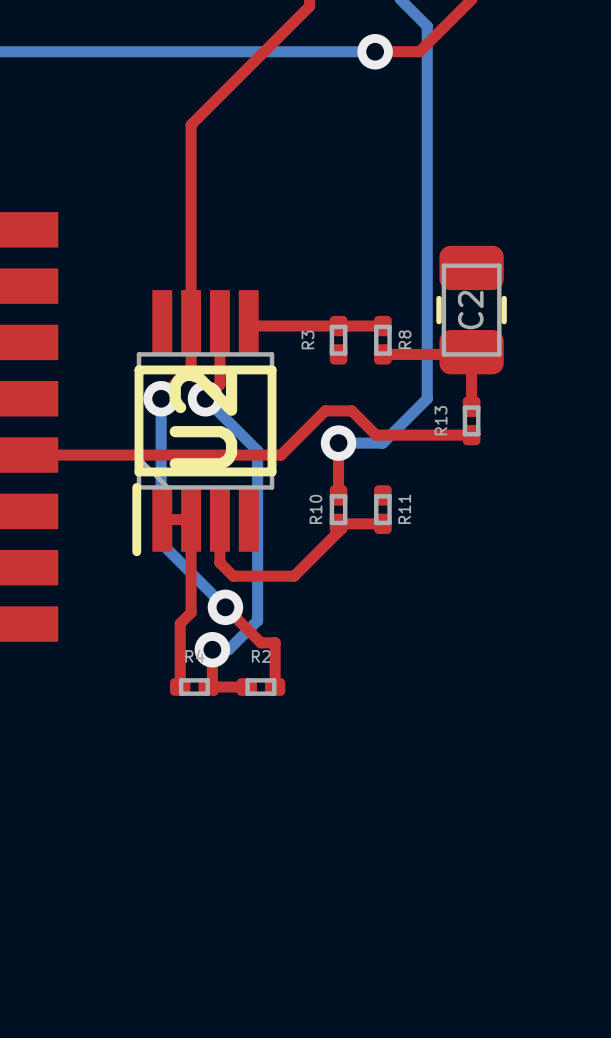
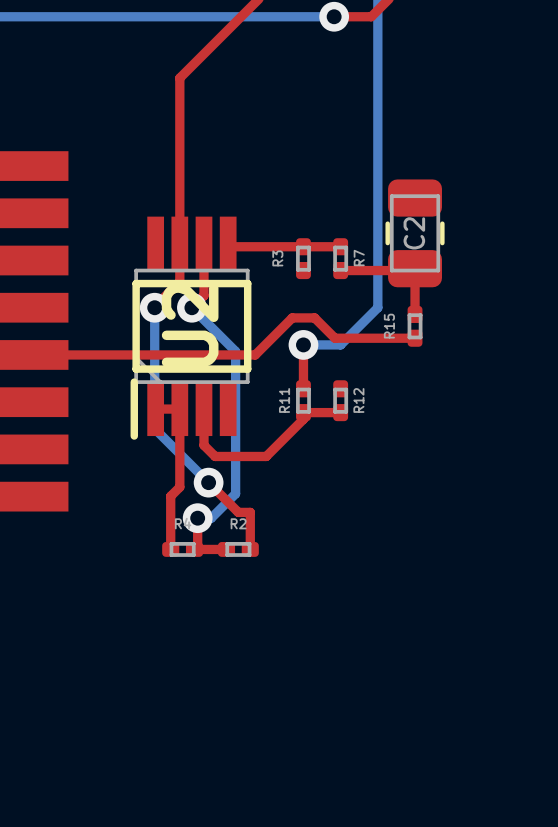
R8 name: R8 (405, 339) -> R7 (359, 258)
R13 name: R13 (441, 420) -> R15 (389, 326)
R10 name: R10 (315, 509) -> R11 (284, 400)
R11 name: R11 (404, 509) -> R12 (358, 400)

